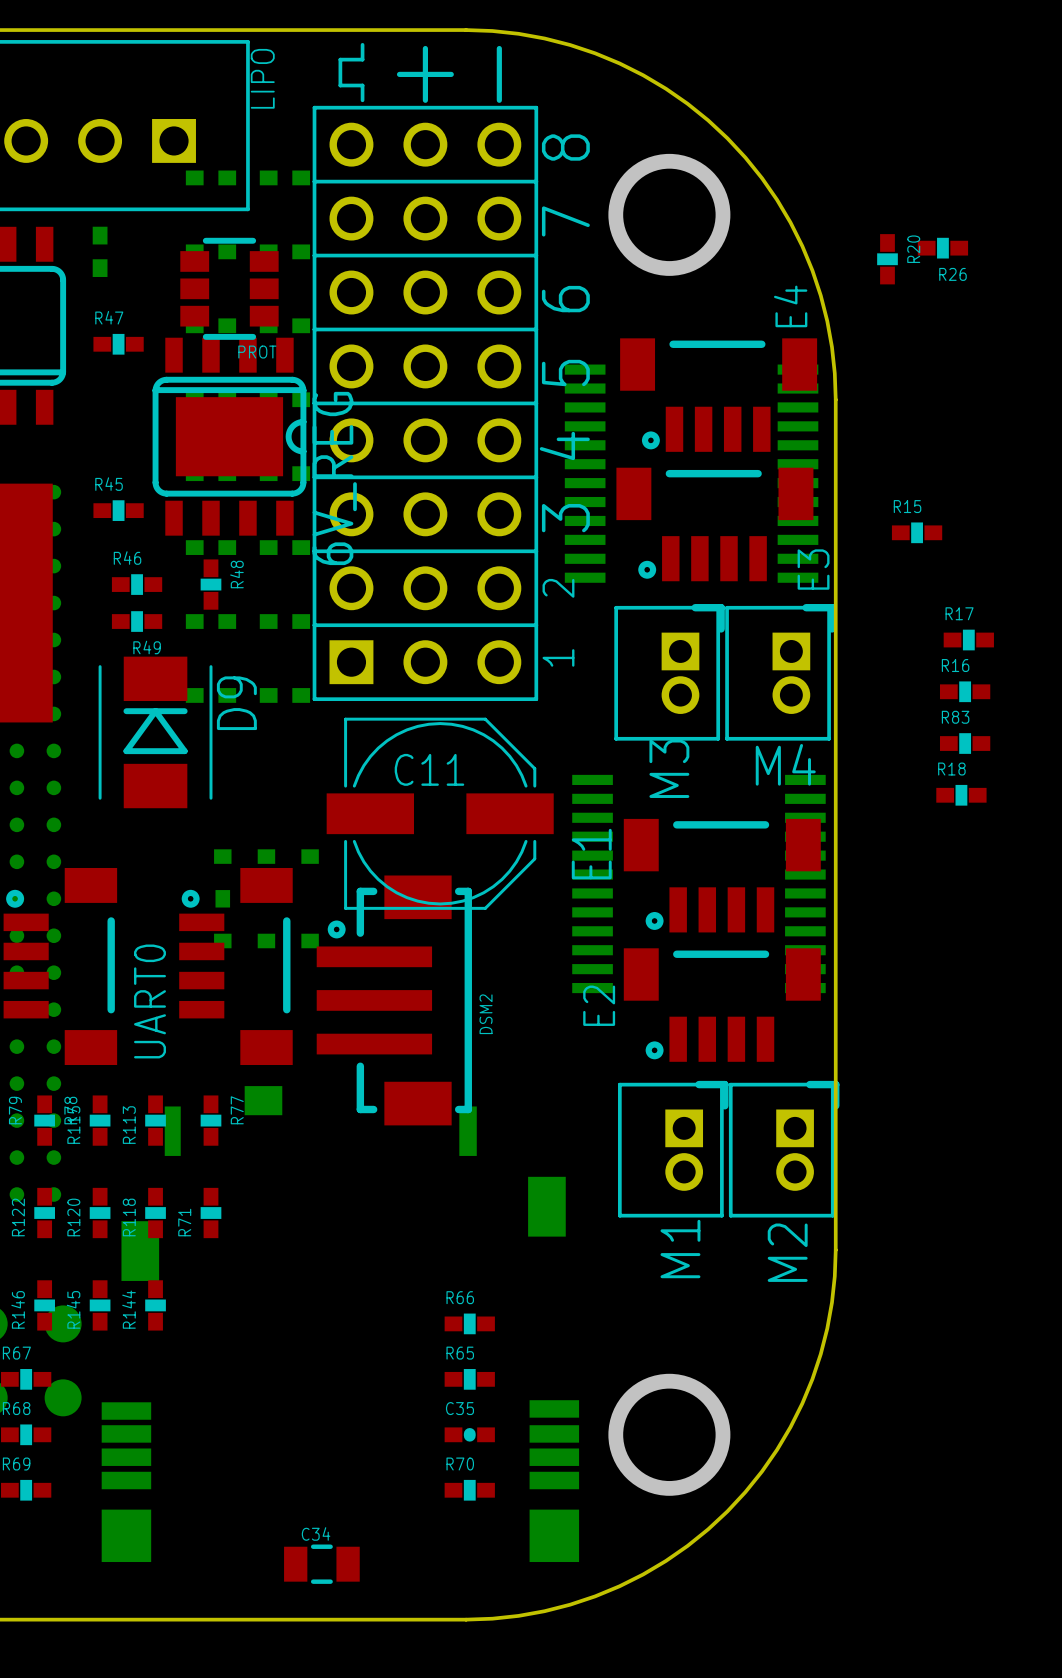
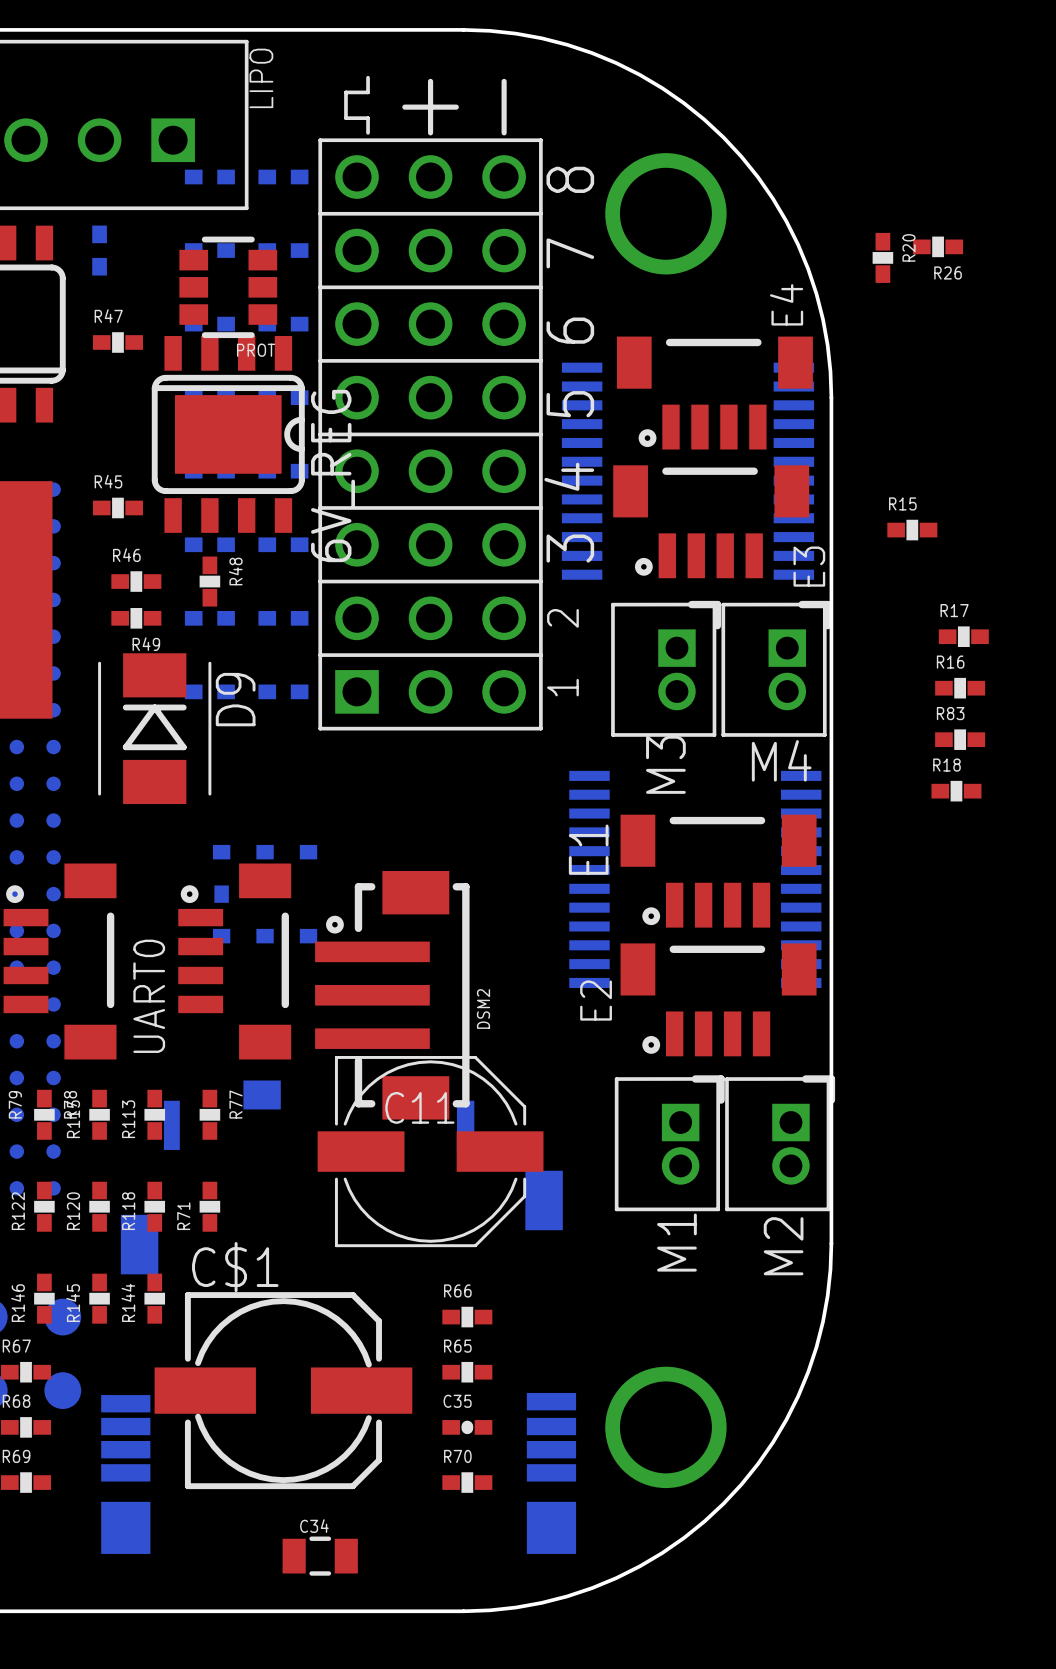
part position: (425, 372) -> (430, 403)
C11 position: (440, 813) -> (430, 1151)
C$1: none -> (283, 1390)

